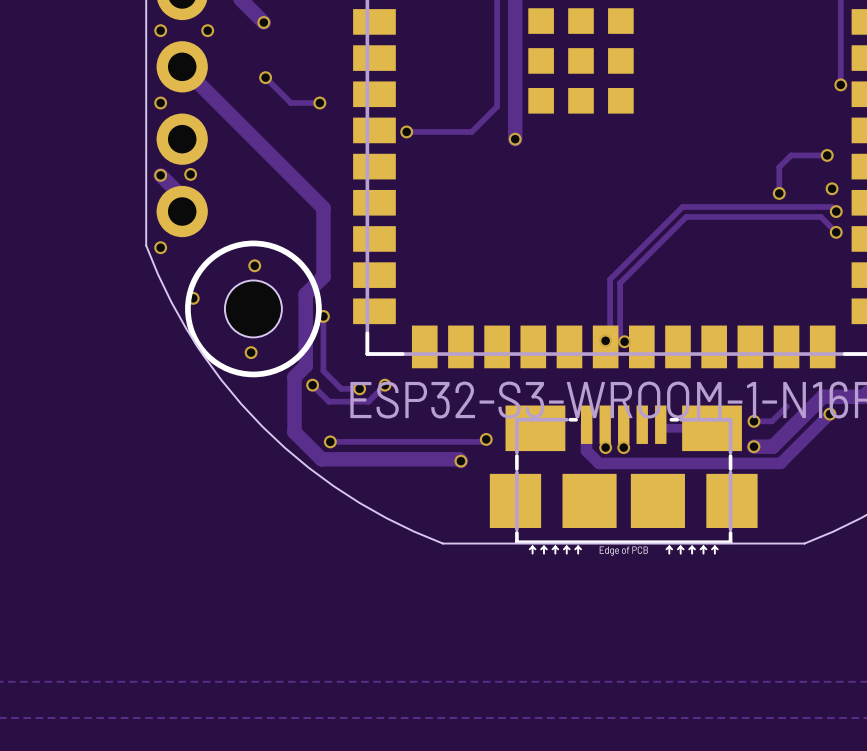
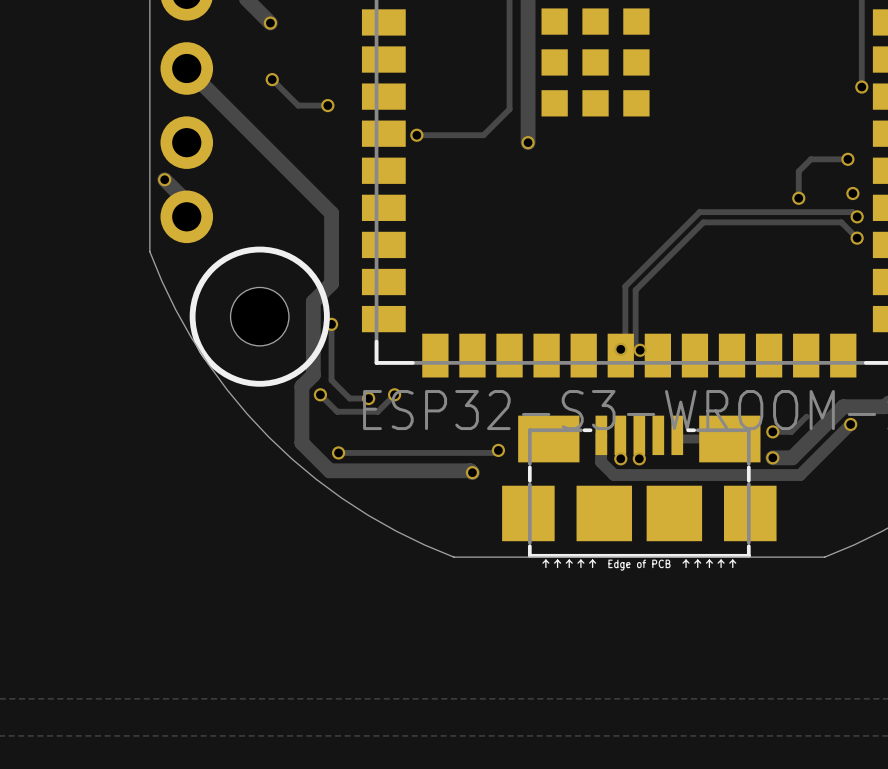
via: (160, 30) -> none
via: (207, 30) -> none
via: (160, 102) -> none
via: (190, 174) -> none
via: (160, 247) -> none
via: (254, 265) -> none
via: (193, 298) -> none
via: (251, 352) -> none

